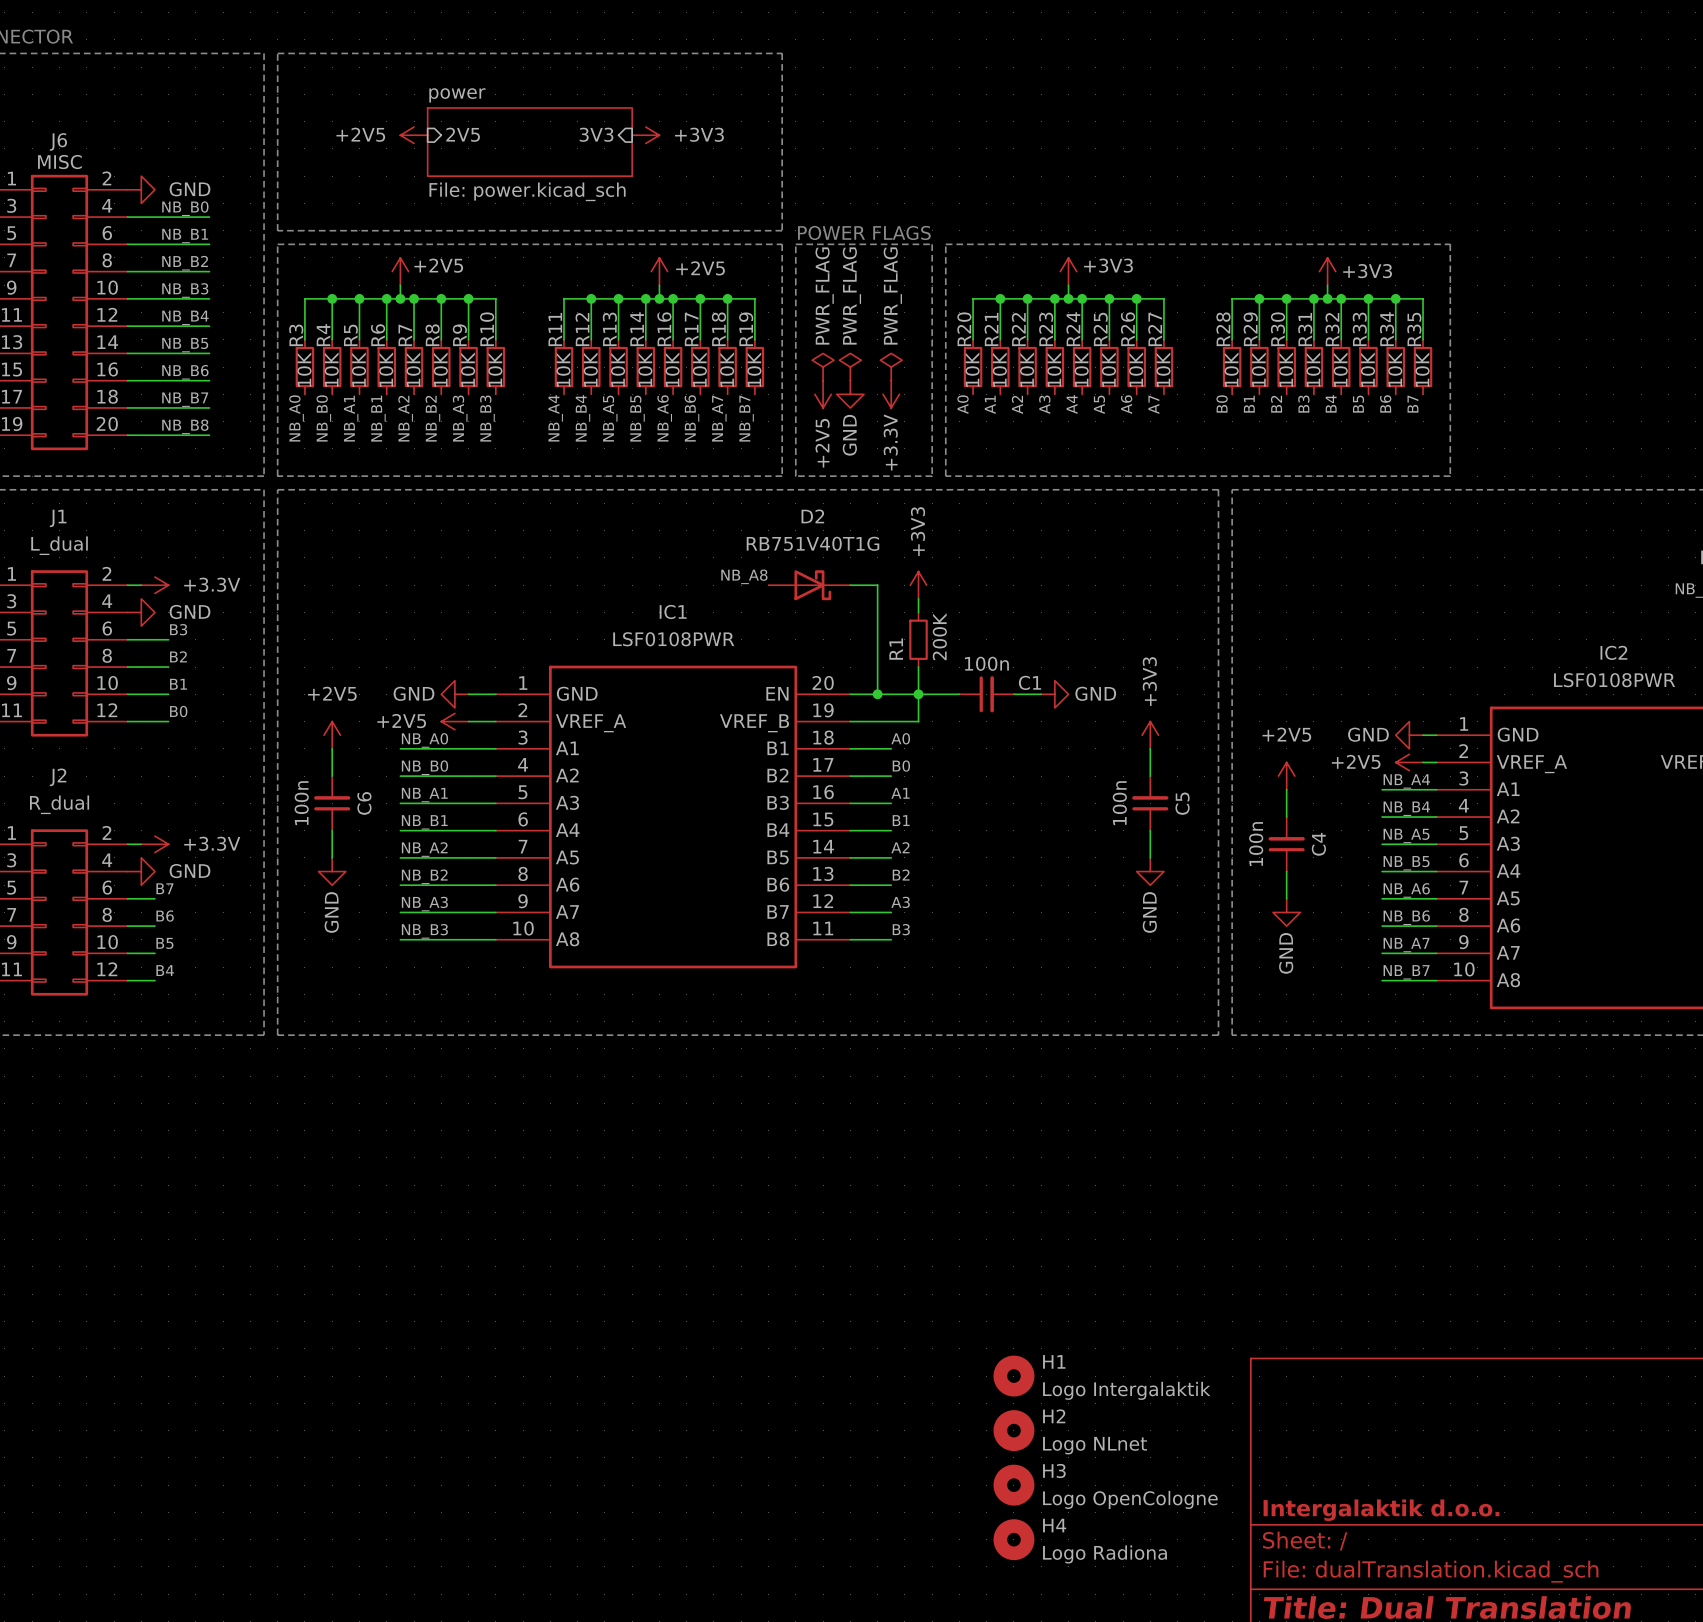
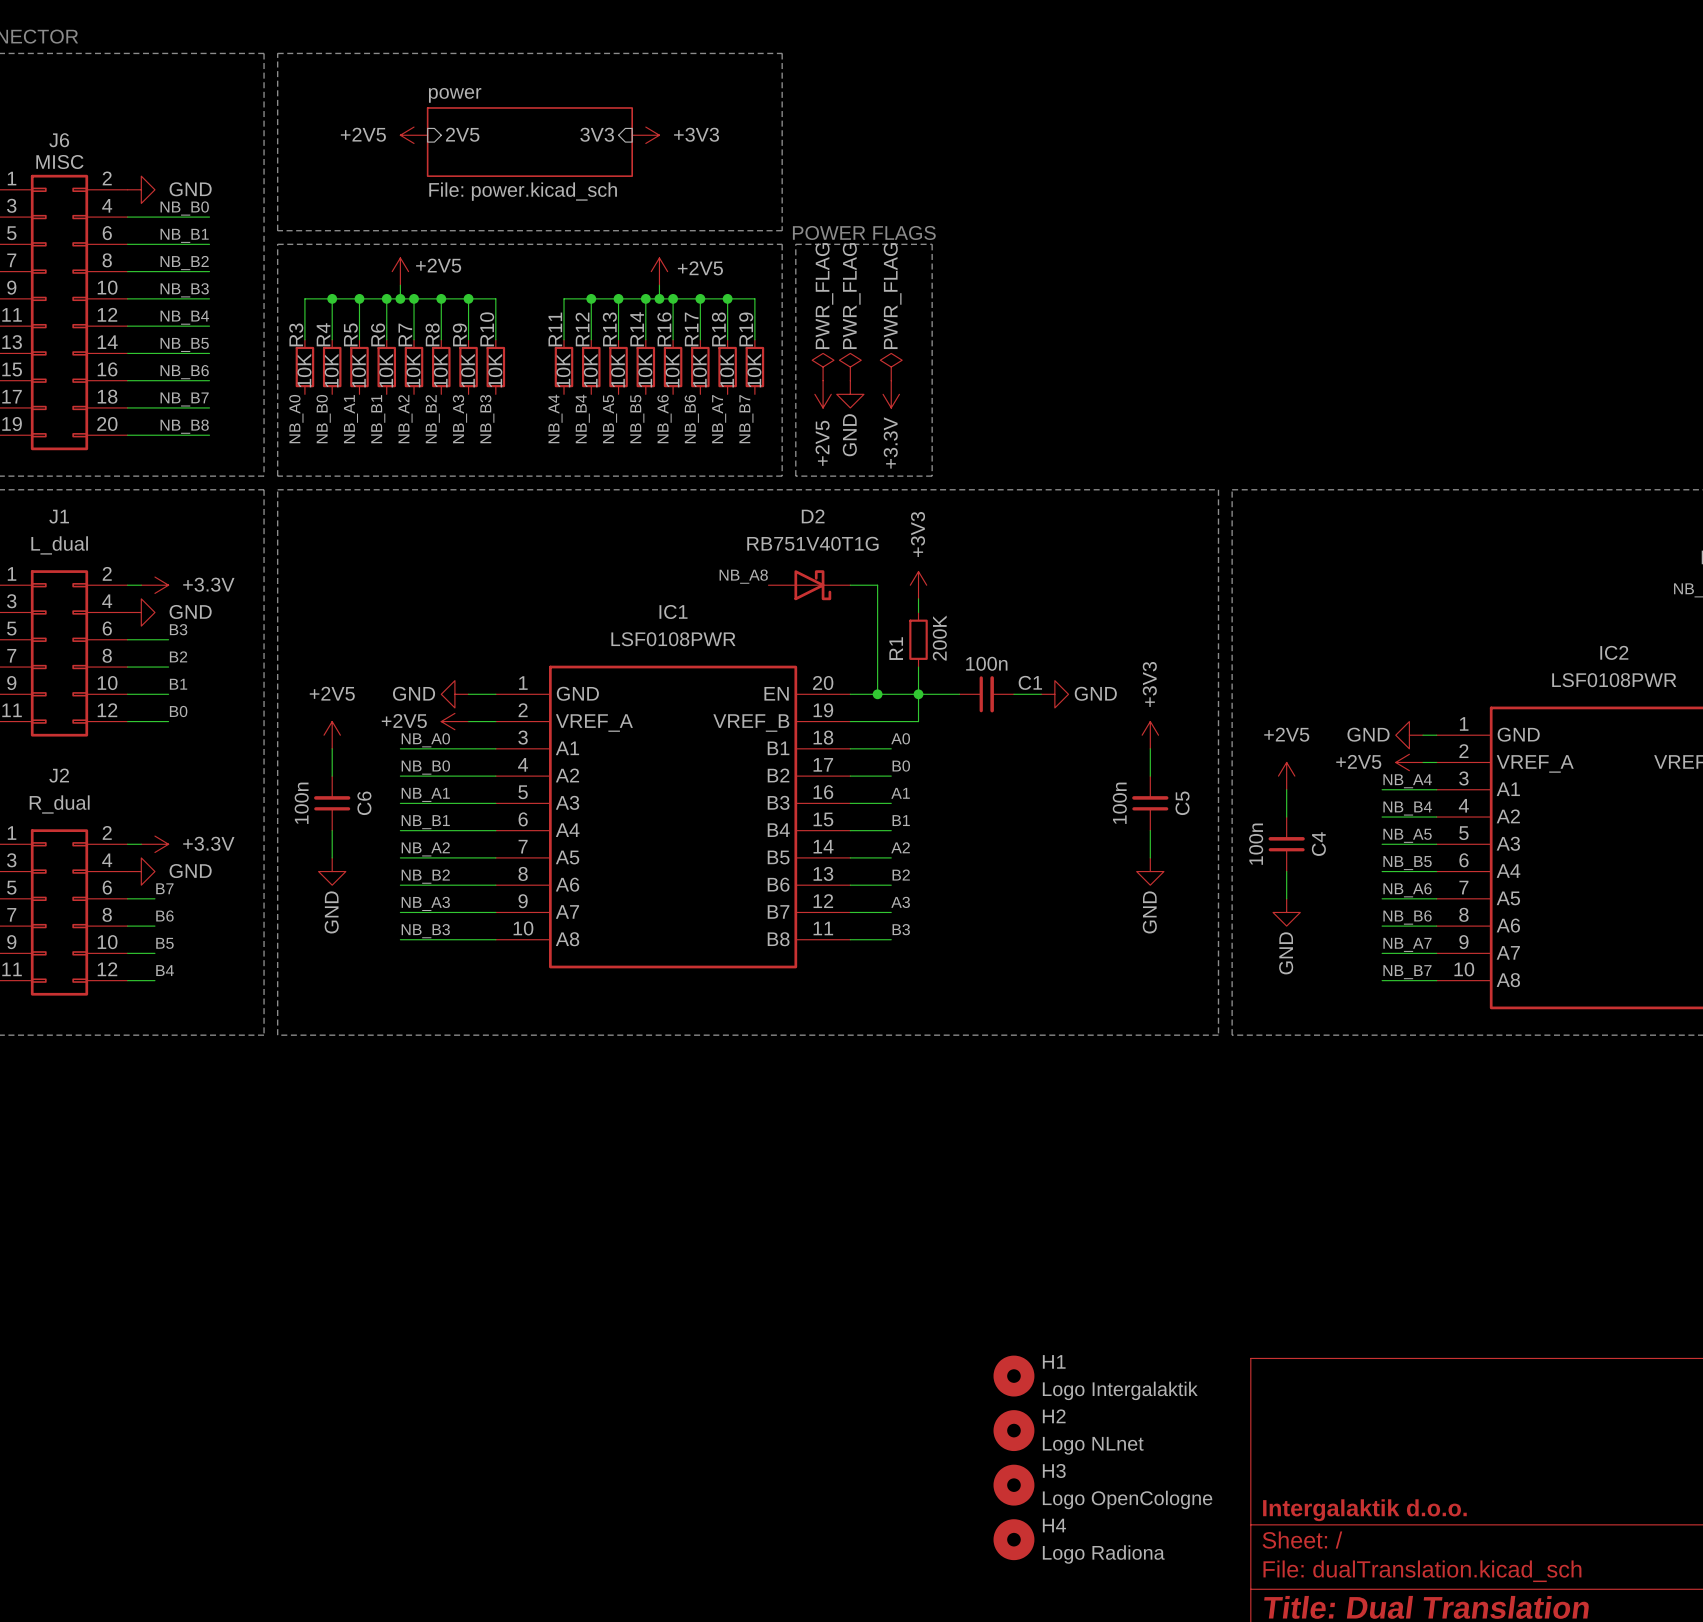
line: (945, 244) (1450, 244) (1450, 476) (945, 476) (945, 244) -> none
power symbol: +3V3 (1068, 271) -> none
power symbol: +3V3 (1327, 271) -> none
wire: (1068, 285) (1068, 298) -> none
wire: (1327, 285) (1327, 298) -> none
wire: (1000, 298) (1000, 339) -> none
junction: (1000, 298) -> none
wire: (1027, 298) (1027, 339) -> none
junction: (1027, 298) -> none
wire: (1054, 298) (1054, 339) -> none
junction: (1054, 298) -> none
junction: (1068, 298) -> none
wire: (1082, 298) (1082, 339) -> none
junction: (1082, 298) -> none
wire: (1109, 298) (1109, 339) -> none
junction: (1109, 298) -> none
wire: (1136, 298) (1136, 339) -> none
junction: (1136, 298) -> none
wire: (1259, 298) (1259, 339) -> none
junction: (1259, 298) -> none
wire: (1286, 298) (1286, 339) -> none
junction: (1286, 298) -> none
wire: (1313, 298) (1313, 339) -> none
junction: (1313, 298) -> none
junction: (1327, 298) -> none
wire: (1341, 298) (1341, 339) -> none
junction: (1341, 298) -> none
wire: (1368, 298) (1368, 339) -> none
junction: (1368, 298) -> none
wire: (1395, 298) (1395, 339) -> none
junction: (1395, 298) -> none
wire: (973, 339) (973, 298) (1163, 298) (1163, 339) -> none
wire: (1232, 339) (1232, 298) (1423, 298) (1423, 339) -> none
R20: 10K (973, 367) -> none
R21: 10K (1000, 367) -> none
R22: 10K (1027, 367) -> none
R23: 10K (1054, 367) -> none
R24: 10K (1082, 367) -> none
R25: 10K (1109, 367) -> none
R26: 10K (1136, 367) -> none
R27: 10K (1163, 367) -> none
R28: 10K (1232, 367) -> none
R29: 10K (1259, 367) -> none
R30: 10K (1286, 367) -> none
R31: 10K (1313, 367) -> none
R32: 10K (1341, 367) -> none
R33: 10K (1368, 367) -> none
R34: 10K (1395, 367) -> none
R35: 10K (1423, 367) -> none
label: B0 (1222, 403) -> none
label: B4 (1331, 403) -> none
label: B6 (1385, 403) -> none
label: A0 (963, 404) -> none
label: A1 (990, 404) -> none
label: A2 (1017, 404) -> none
label: A3 (1044, 404) -> none
label: A4 (1072, 404) -> none
label: A5 (1099, 404) -> none
label: A6 (1126, 404) -> none
label: A7 (1153, 404) -> none
label: B1 (1249, 404) -> none
label: B2 (1276, 404) -> none
label: B3 (1303, 404) -> none
label: B5 (1358, 404) -> none
label: B7 (1412, 404) -> none

